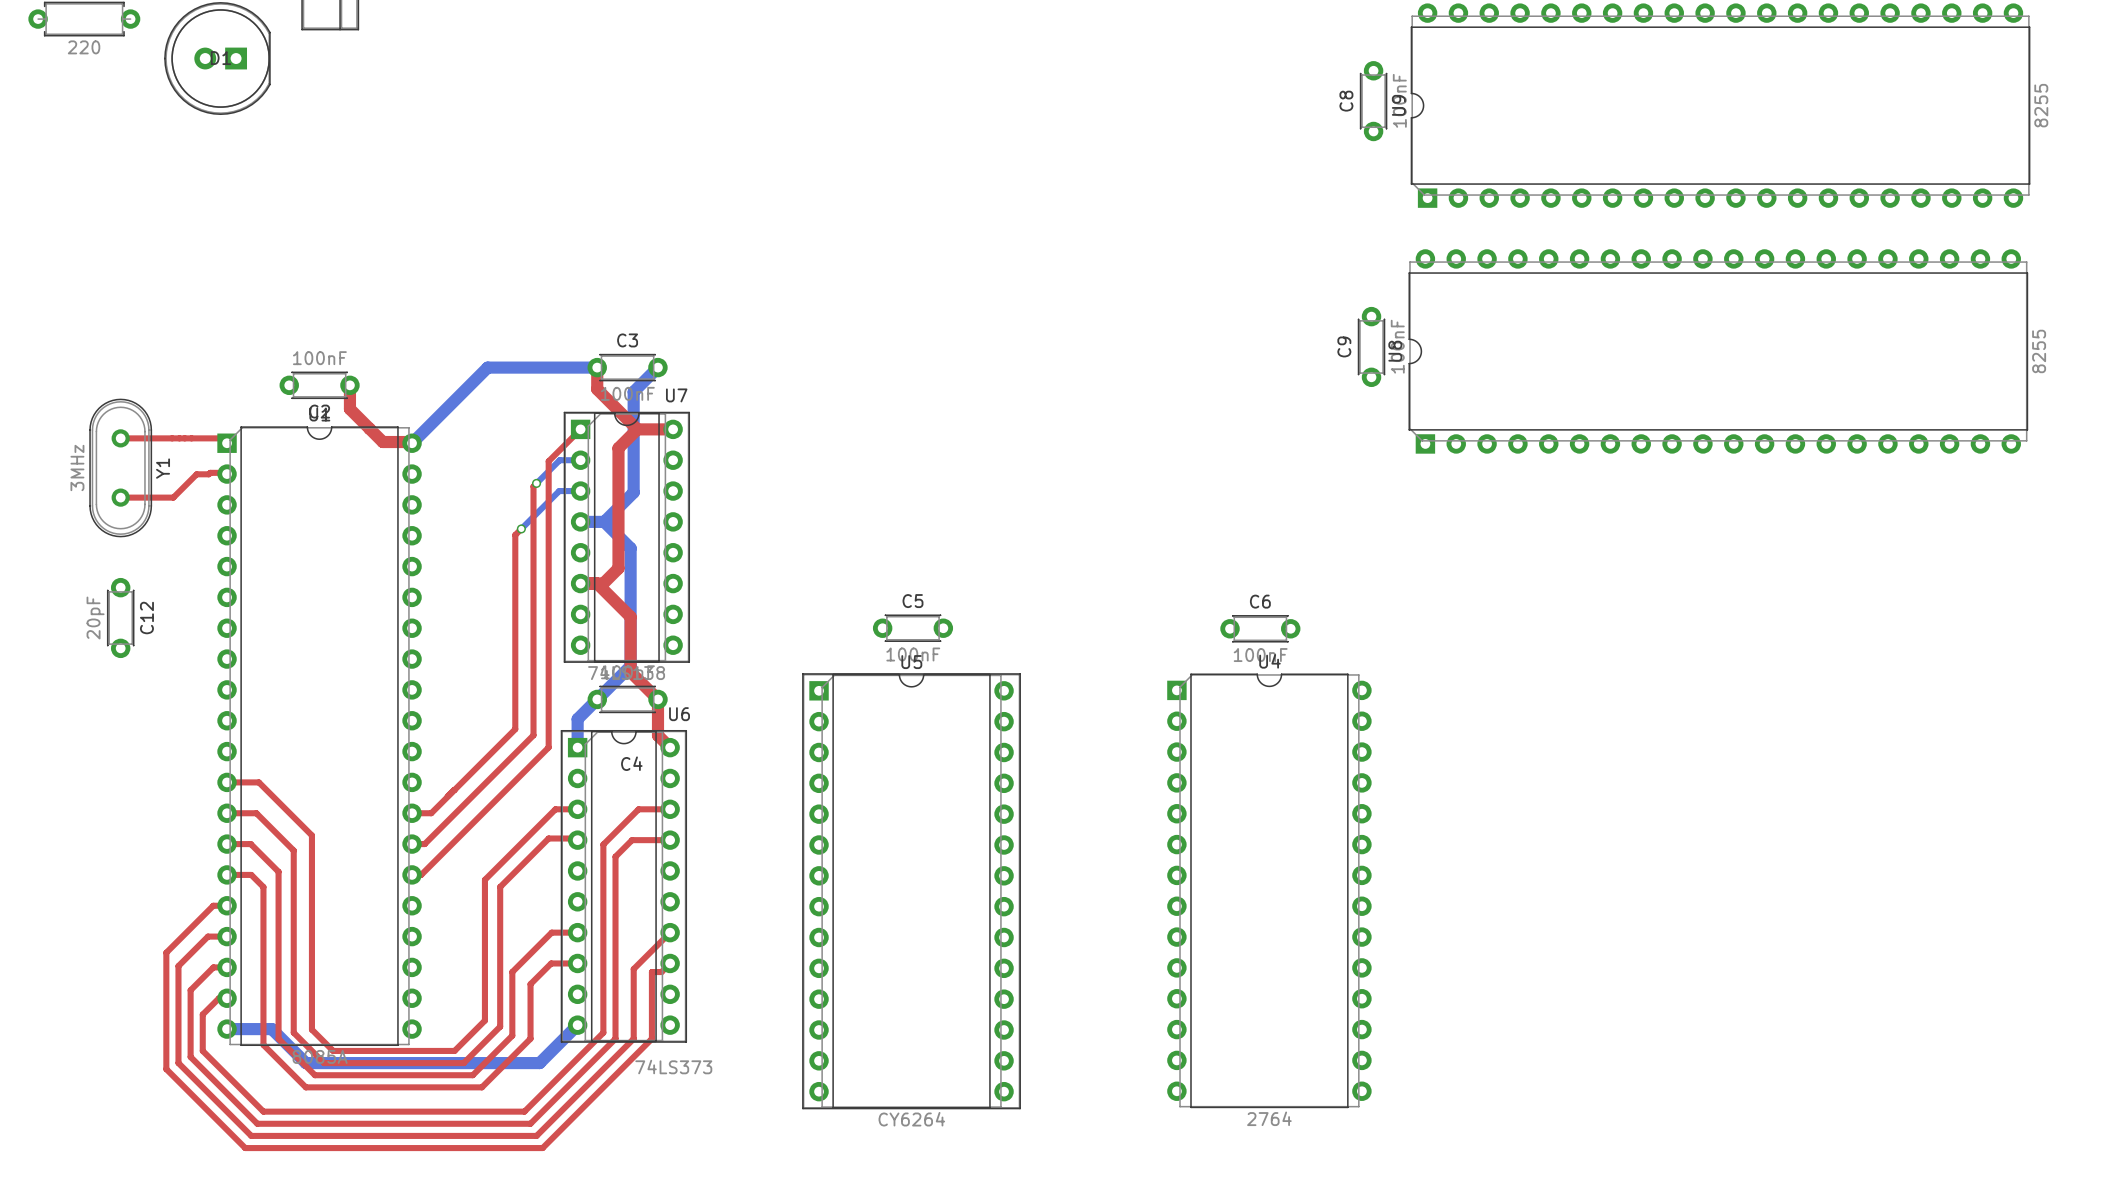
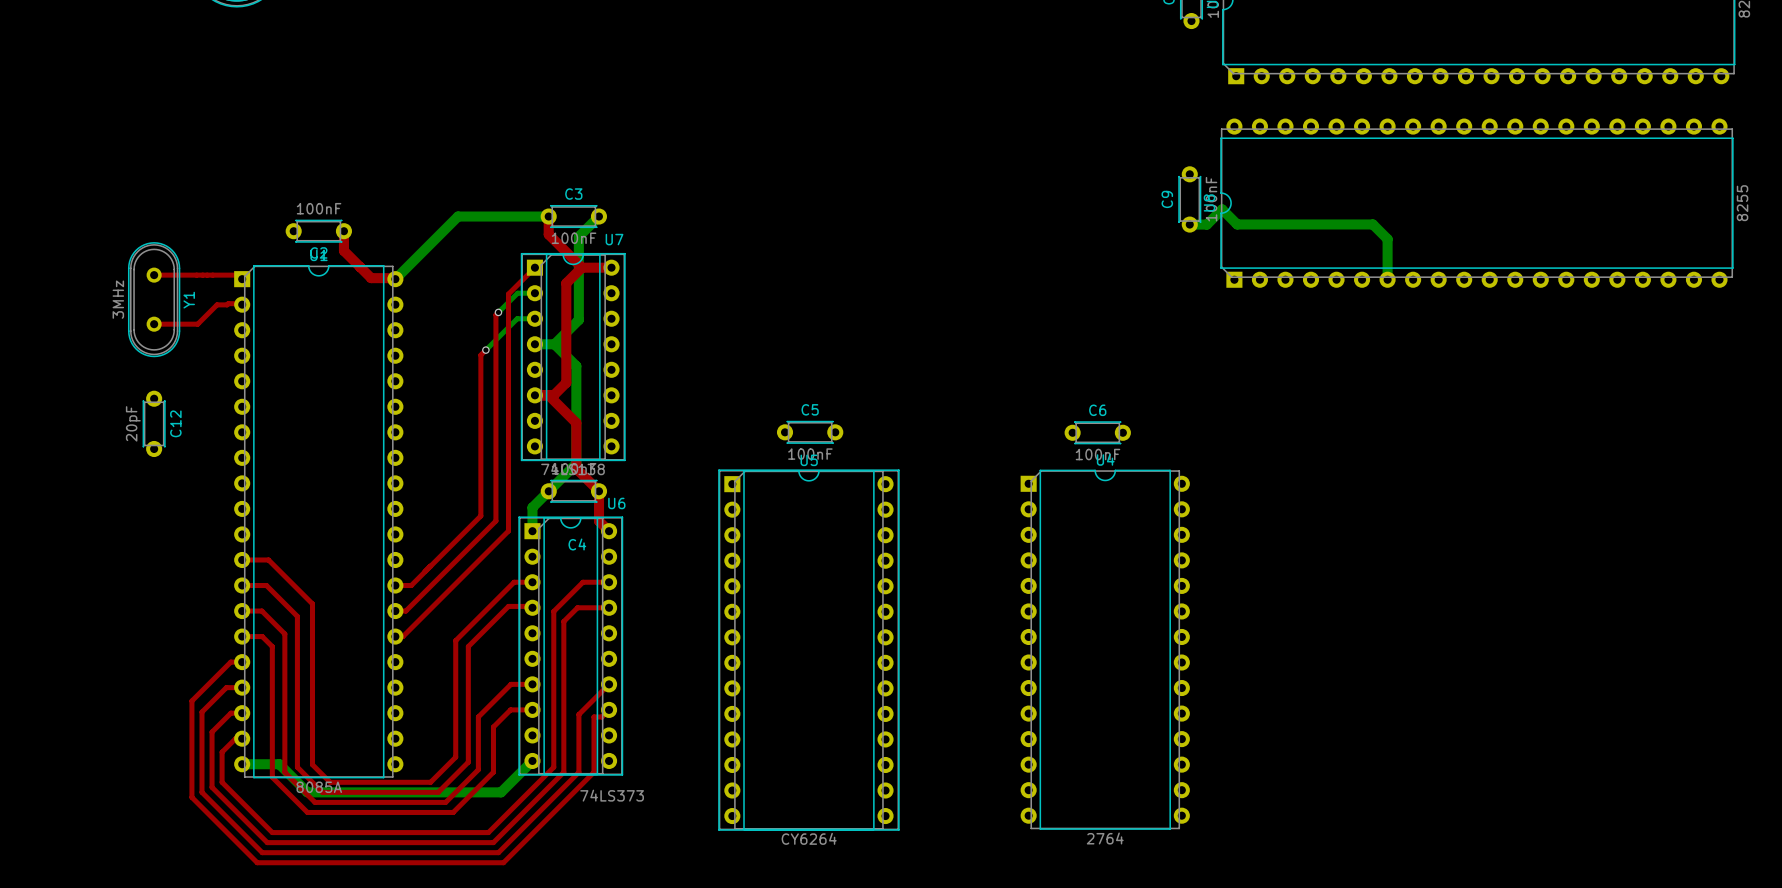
bottom track: none -> (1189, 224) (1206, 224) (1222, 209) (1237, 224) (1372, 224) (1387, 239) (1387, 279)

